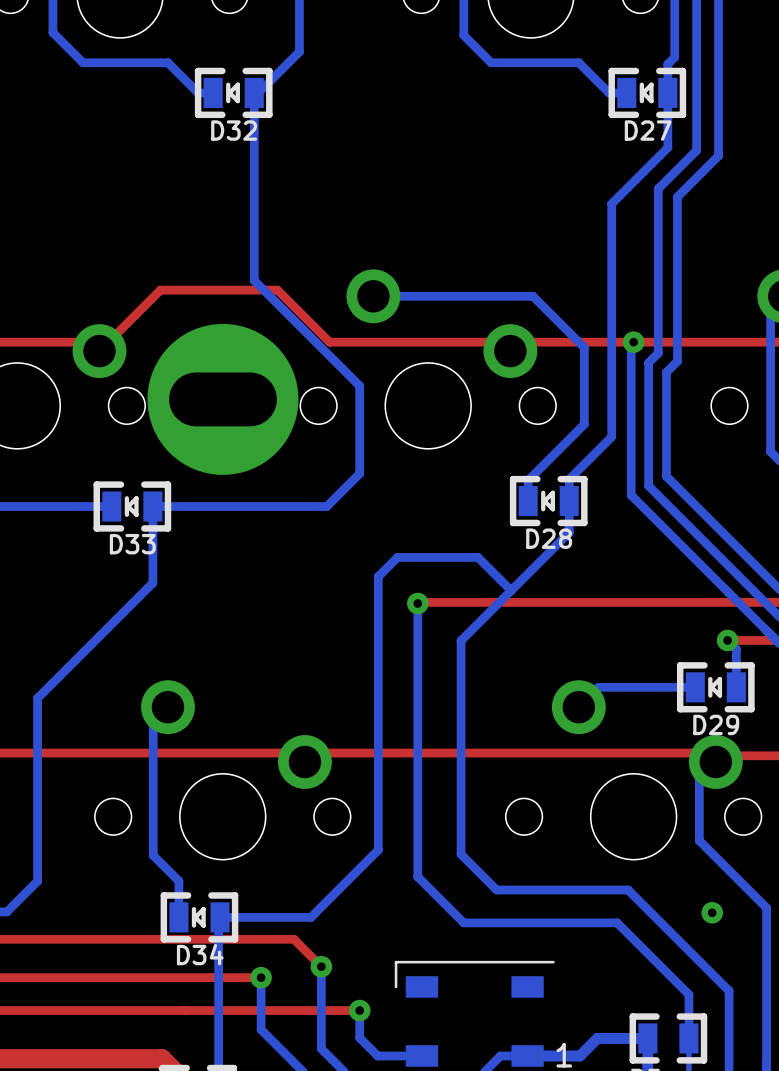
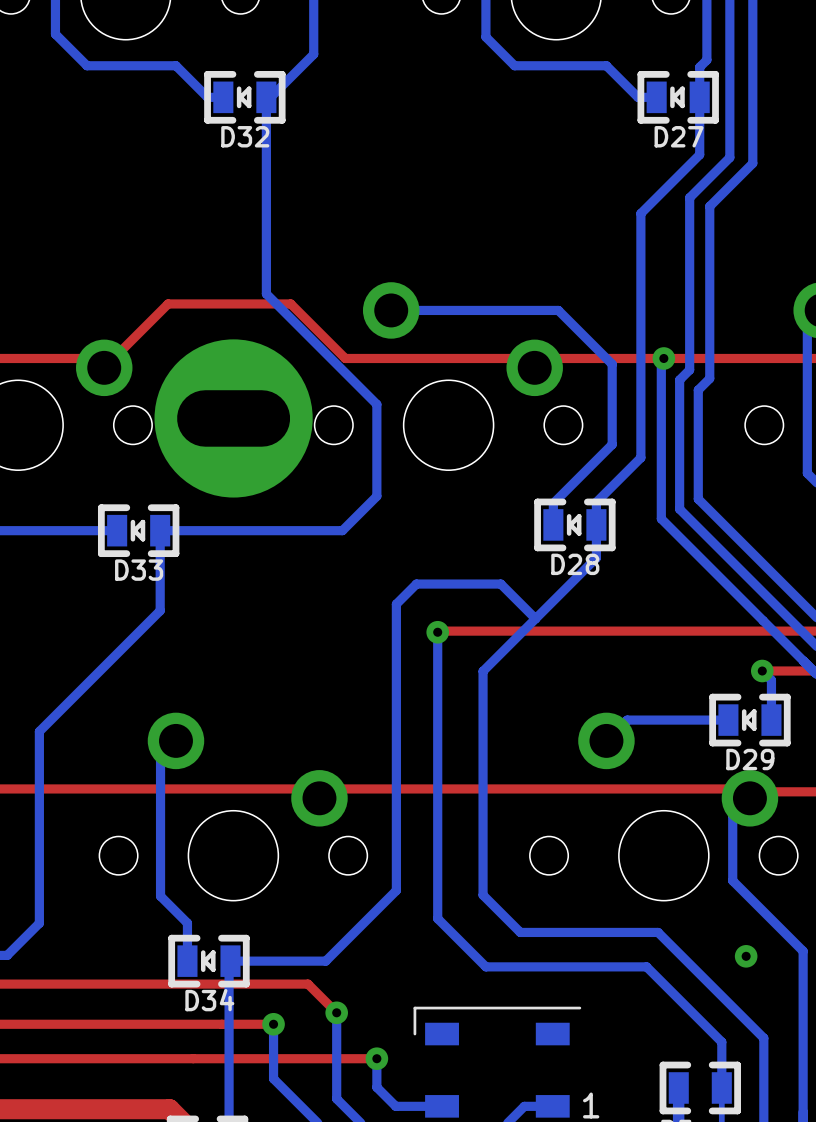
bottom track: (647, 1038) (597, 1038) (579, 1055) (527, 1055) -> none

